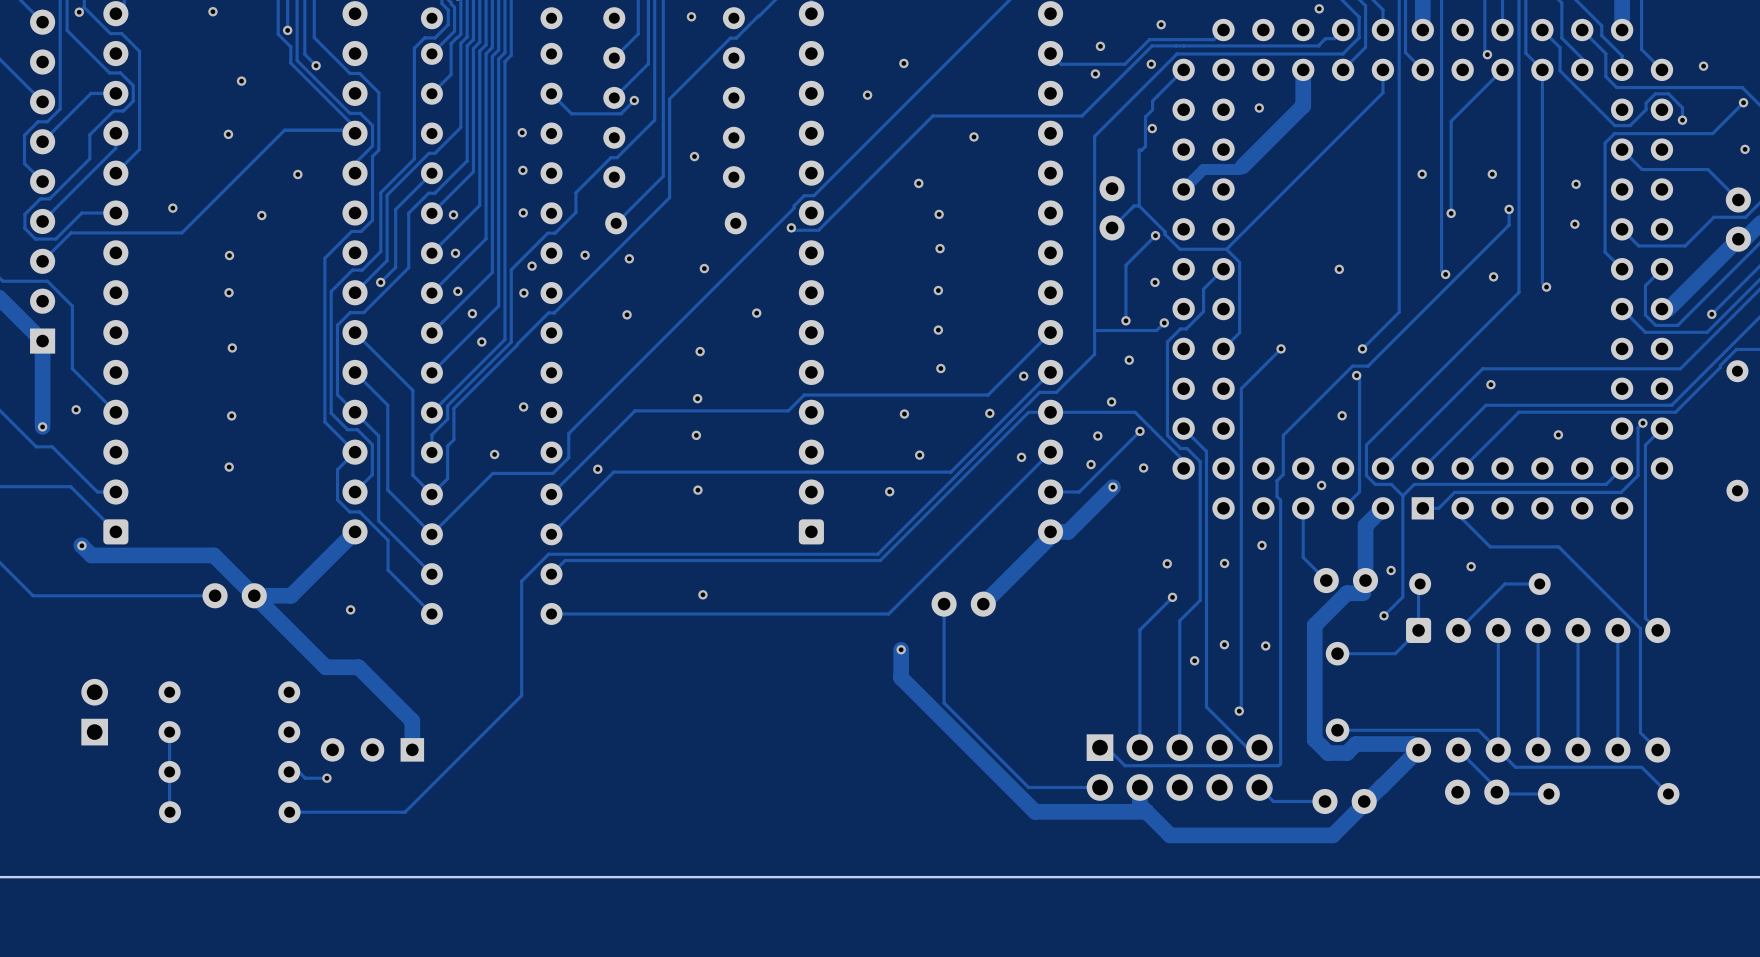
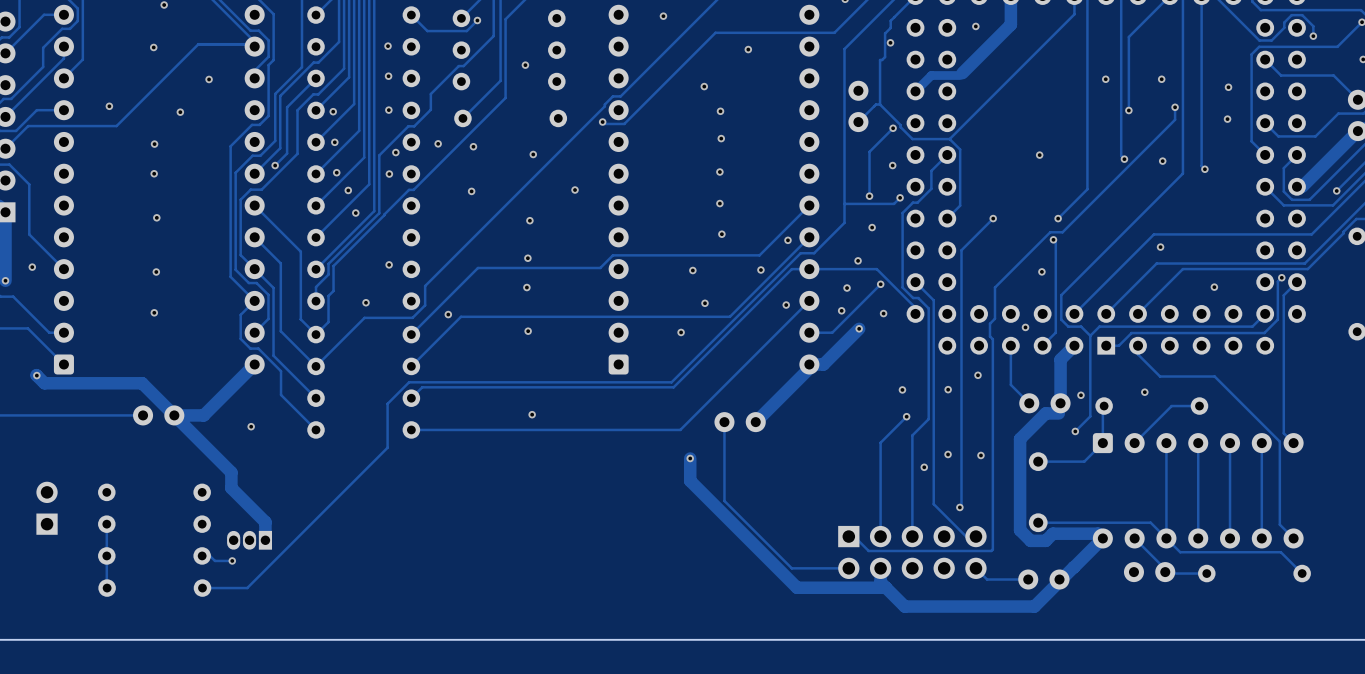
track: (521, 636) (521, 695) (405, 812) (345, 812) -> (387, 447) (247, 588)
track: (325, 667) (358, 667) (412, 720) (412, 749) -> (231, 472) (231, 488) (265, 522) (265, 535)
part: (372, 749) -> none
part: none -> (249, 540)

